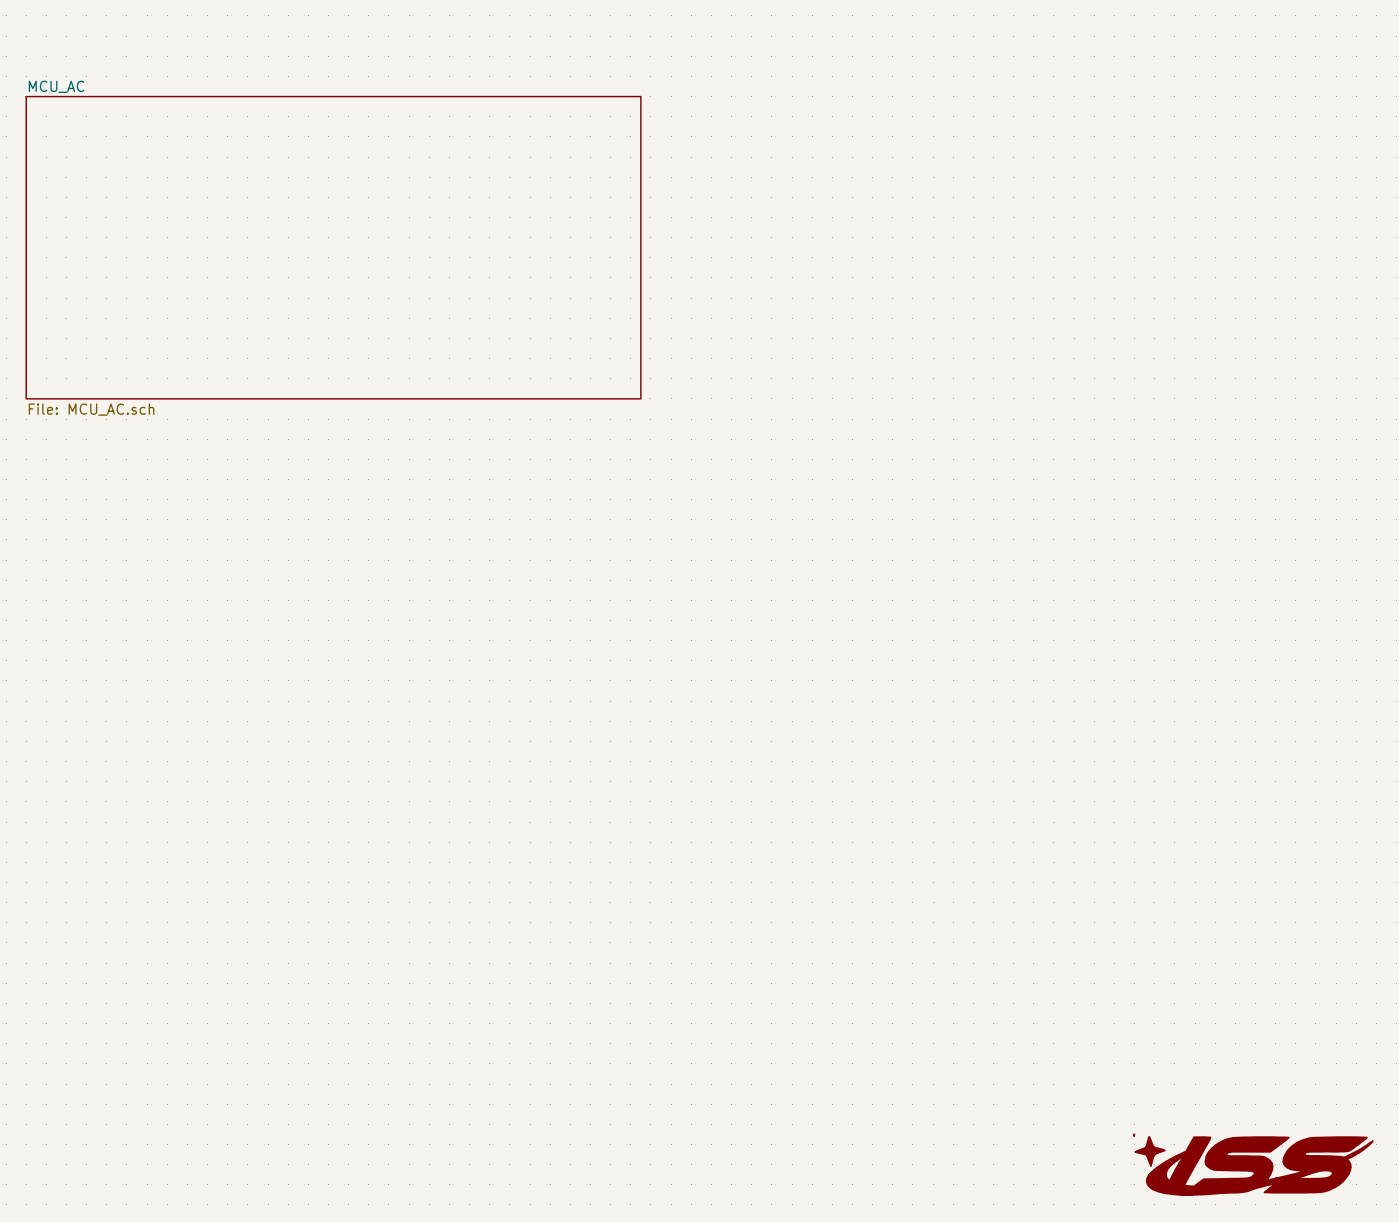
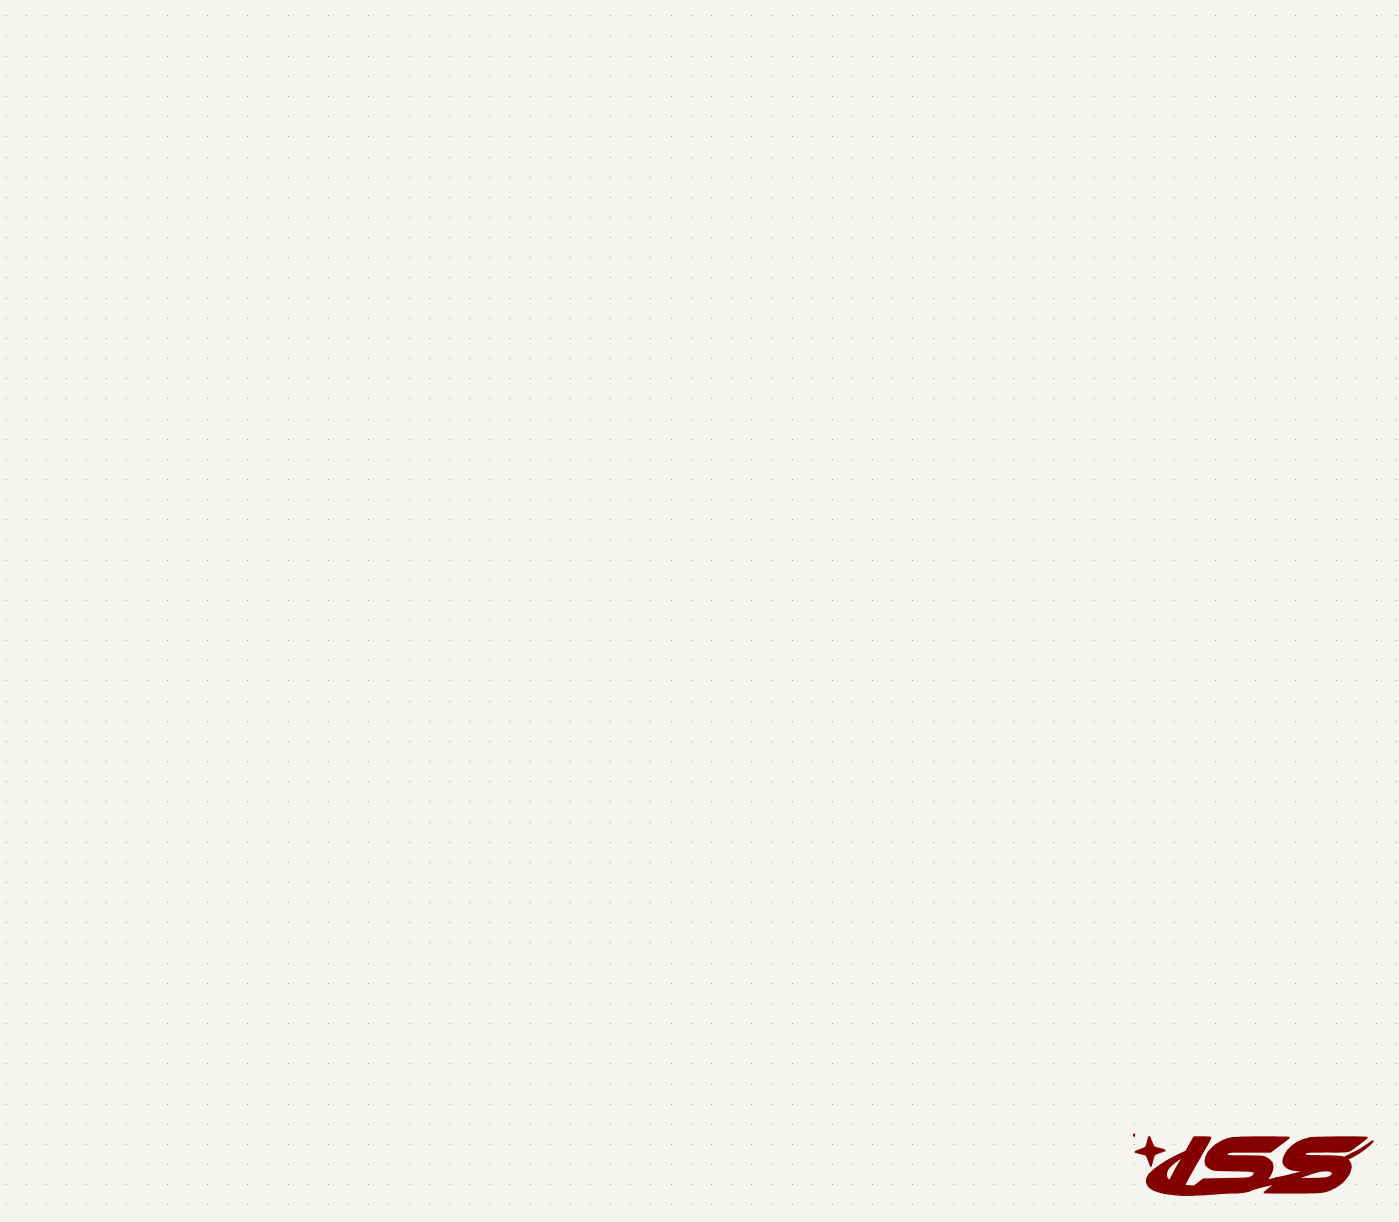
sheet MCU_AC: File: MCU_AC.sch (333, 247) -> none

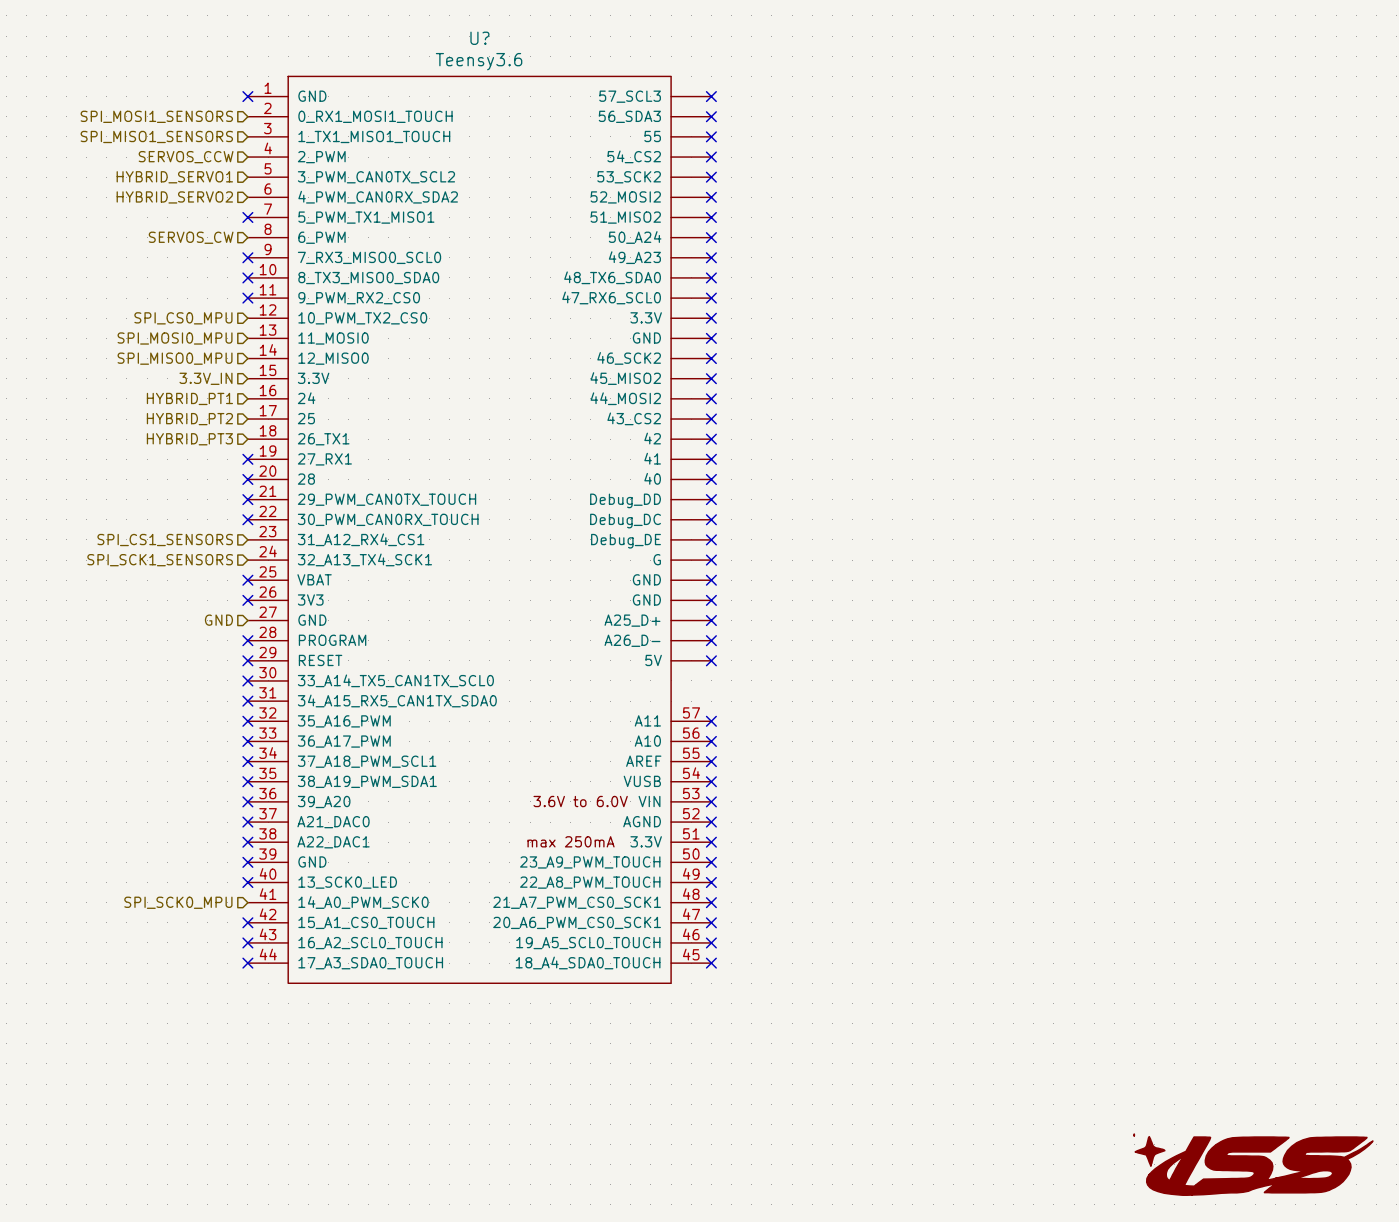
no-connect mark: none -> (247, 96)
no-connect mark: none -> (711, 96)
hierarchical label: none -> SPI_MOSI1_SENSORS (156, 116)
no-connect mark: none -> (711, 116)
hierarchical label: none -> SPI_MISO1_SENSORS (156, 136)
no-connect mark: none -> (711, 136)
hierarchical label: none -> SERVOS_CCW (186, 157)
no-connect mark: none -> (711, 157)
hierarchical label: none -> HYBRID_SERVO1 (174, 177)
no-connect mark: none -> (711, 177)
hierarchical label: none -> HYBRID_SERVO2 (174, 197)
no-connect mark: none -> (711, 197)
no-connect mark: none -> (247, 217)
no-connect mark: none -> (711, 217)
hierarchical label: none -> SERVOS_CW (191, 237)
no-connect mark: none -> (711, 237)
no-connect mark: none -> (247, 257)
no-connect mark: none -> (711, 257)
no-connect mark: none -> (247, 277)
no-connect mark: none -> (711, 277)
no-connect mark: none -> (247, 298)
no-connect mark: none -> (711, 298)
hierarchical label: none -> SPI_CS0_MPU (183, 318)
no-connect mark: none -> (711, 318)
hierarchical label: none -> SPI_MOSI0_MPU (175, 338)
no-connect mark: none -> (711, 338)
hierarchical label: none -> SPI_MISO0_MPU (175, 358)
no-connect mark: none -> (711, 358)
hierarchical label: none -> 3.3V_IN (205, 378)
no-connect mark: none -> (711, 378)
hierarchical label: none -> HYBRID_PT1 (189, 398)
no-connect mark: none -> (711, 398)
hierarchical label: none -> HYBRID_PT2 (189, 419)
no-connect mark: none -> (711, 419)
hierarchical label: none -> HYBRID_PT3 (189, 439)
no-connect mark: none -> (711, 439)
no-connect mark: none -> (247, 459)
no-connect mark: none -> (711, 459)
no-connect mark: none -> (247, 479)
no-connect mark: none -> (711, 479)
no-connect mark: none -> (247, 499)
no-connect mark: none -> (711, 499)
no-connect mark: none -> (247, 519)
no-connect mark: none -> (711, 519)
U?: none -> Teensy3.6 (479, 529)
no-connect mark: none -> (711, 539)
hierarchical label: none -> SPI_CS1_SENSORS (165, 540)
hierarchical label: none -> SPI_SCK1_SENSORS (160, 560)
no-connect mark: none -> (711, 560)
no-connect mark: none -> (247, 580)
no-connect mark: none -> (711, 580)
no-connect mark: none -> (247, 600)
no-connect mark: none -> (711, 600)
hierarchical label: none -> GND (218, 620)
no-connect mark: none -> (711, 620)
no-connect mark: none -> (247, 640)
no-connect mark: none -> (711, 640)
no-connect mark: none -> (247, 660)
no-connect mark: none -> (711, 660)
no-connect mark: none -> (247, 680)
no-connect mark: none -> (247, 701)
no-connect mark: none -> (247, 721)
no-connect mark: none -> (711, 721)
no-connect mark: none -> (247, 741)
no-connect mark: none -> (711, 741)
no-connect mark: none -> (247, 761)
no-connect mark: none -> (711, 761)
no-connect mark: none -> (247, 781)
no-connect mark: none -> (711, 781)
no-connect mark: none -> (247, 801)
no-connect mark: none -> (711, 801)
no-connect mark: none -> (247, 822)
no-connect mark: none -> (711, 822)
no-connect mark: none -> (247, 842)
no-connect mark: none -> (711, 842)
no-connect mark: none -> (247, 862)
no-connect mark: none -> (711, 862)
no-connect mark: none -> (247, 882)
no-connect mark: none -> (711, 882)
hierarchical label: none -> SPI_SCK0_MPU (178, 902)
no-connect mark: none -> (711, 902)
no-connect mark: none -> (247, 922)
no-connect mark: none -> (711, 922)
no-connect mark: none -> (247, 942)
no-connect mark: none -> (711, 942)
no-connect mark: none -> (247, 963)
no-connect mark: none -> (711, 963)

